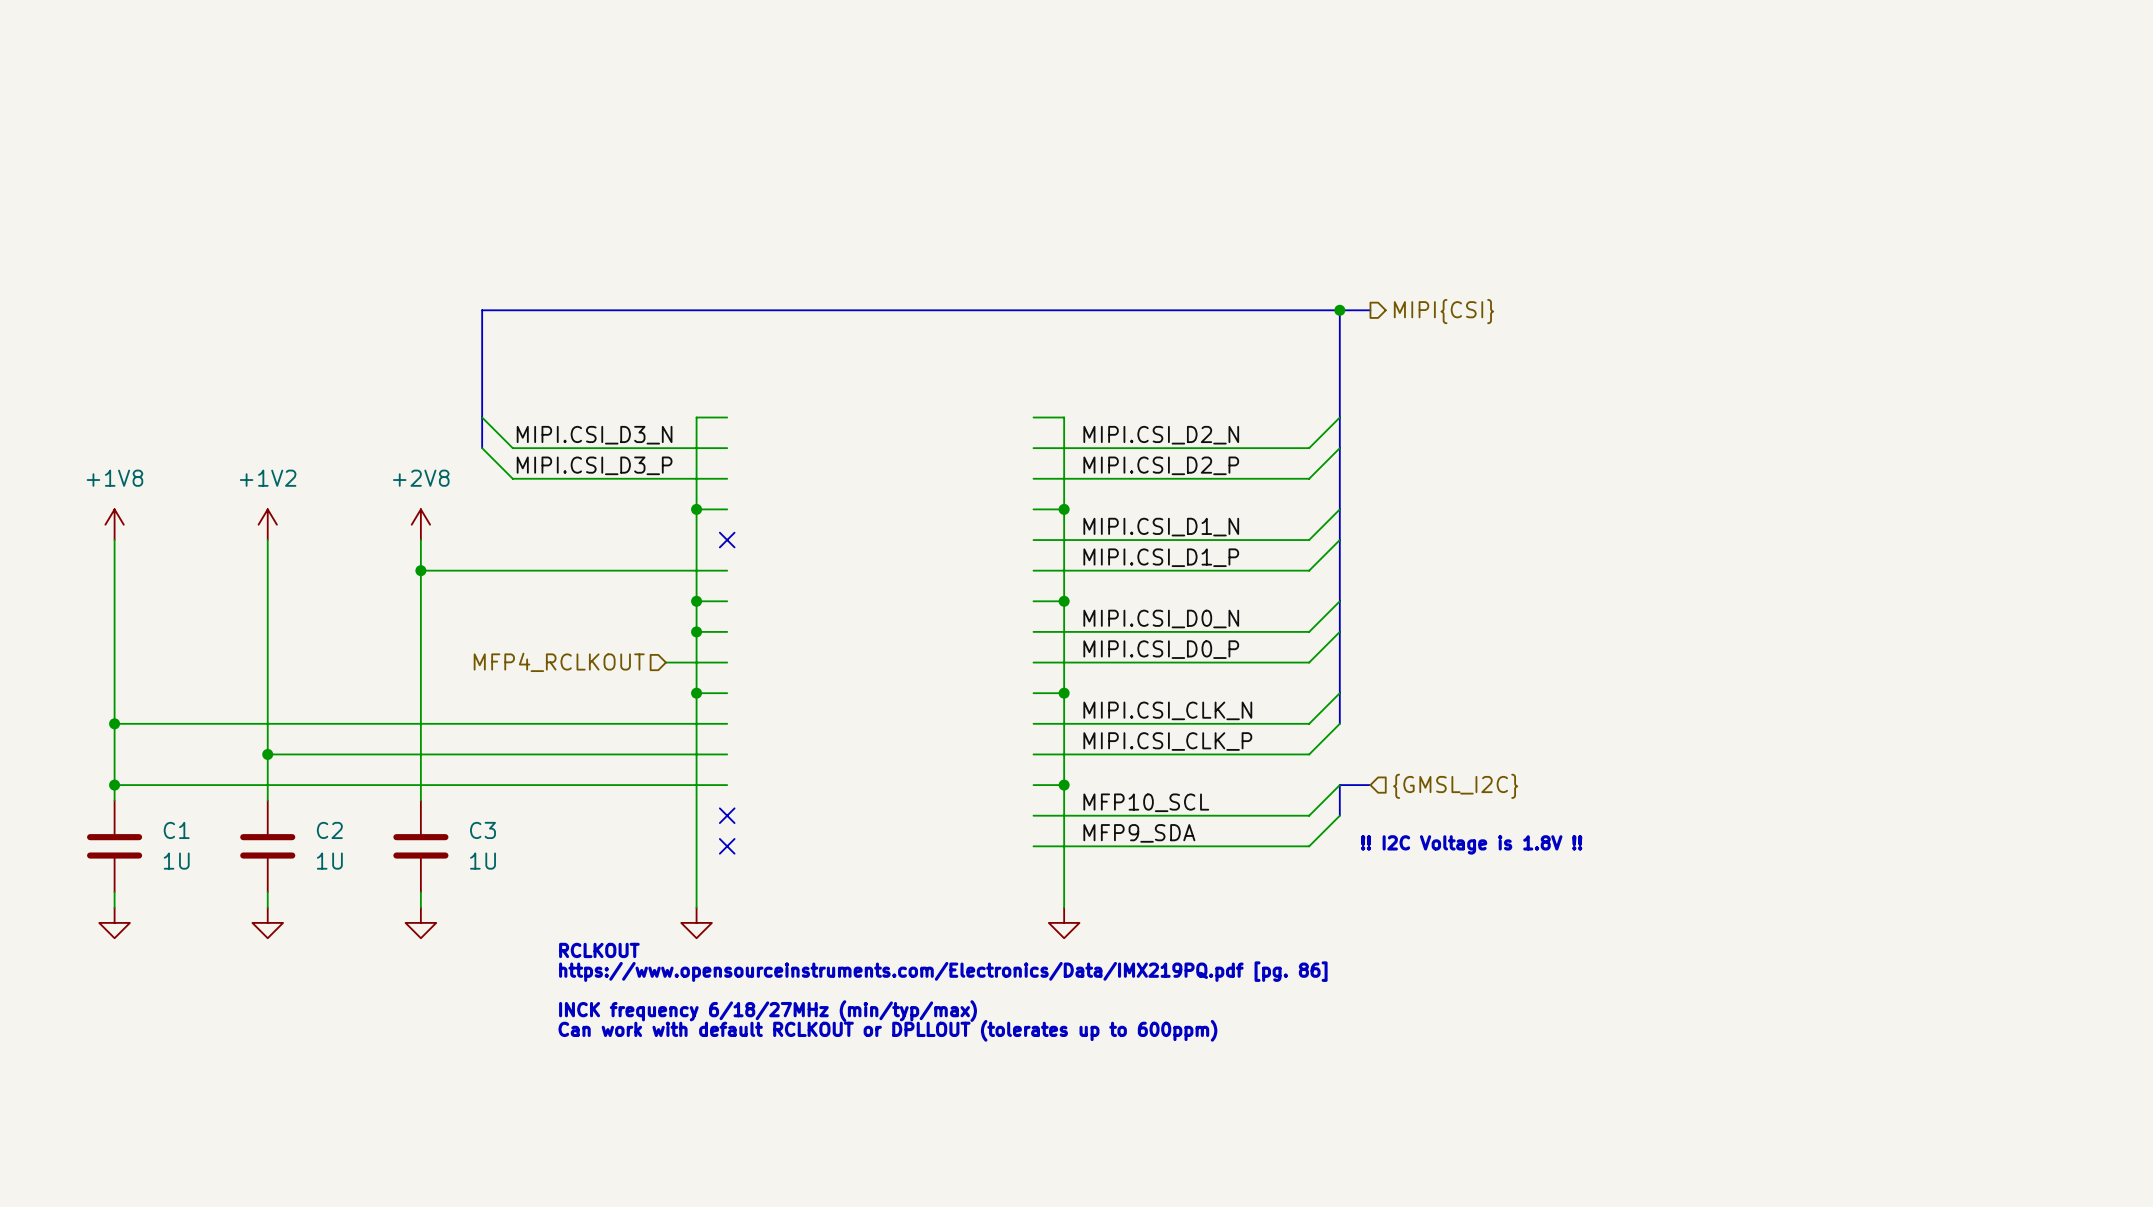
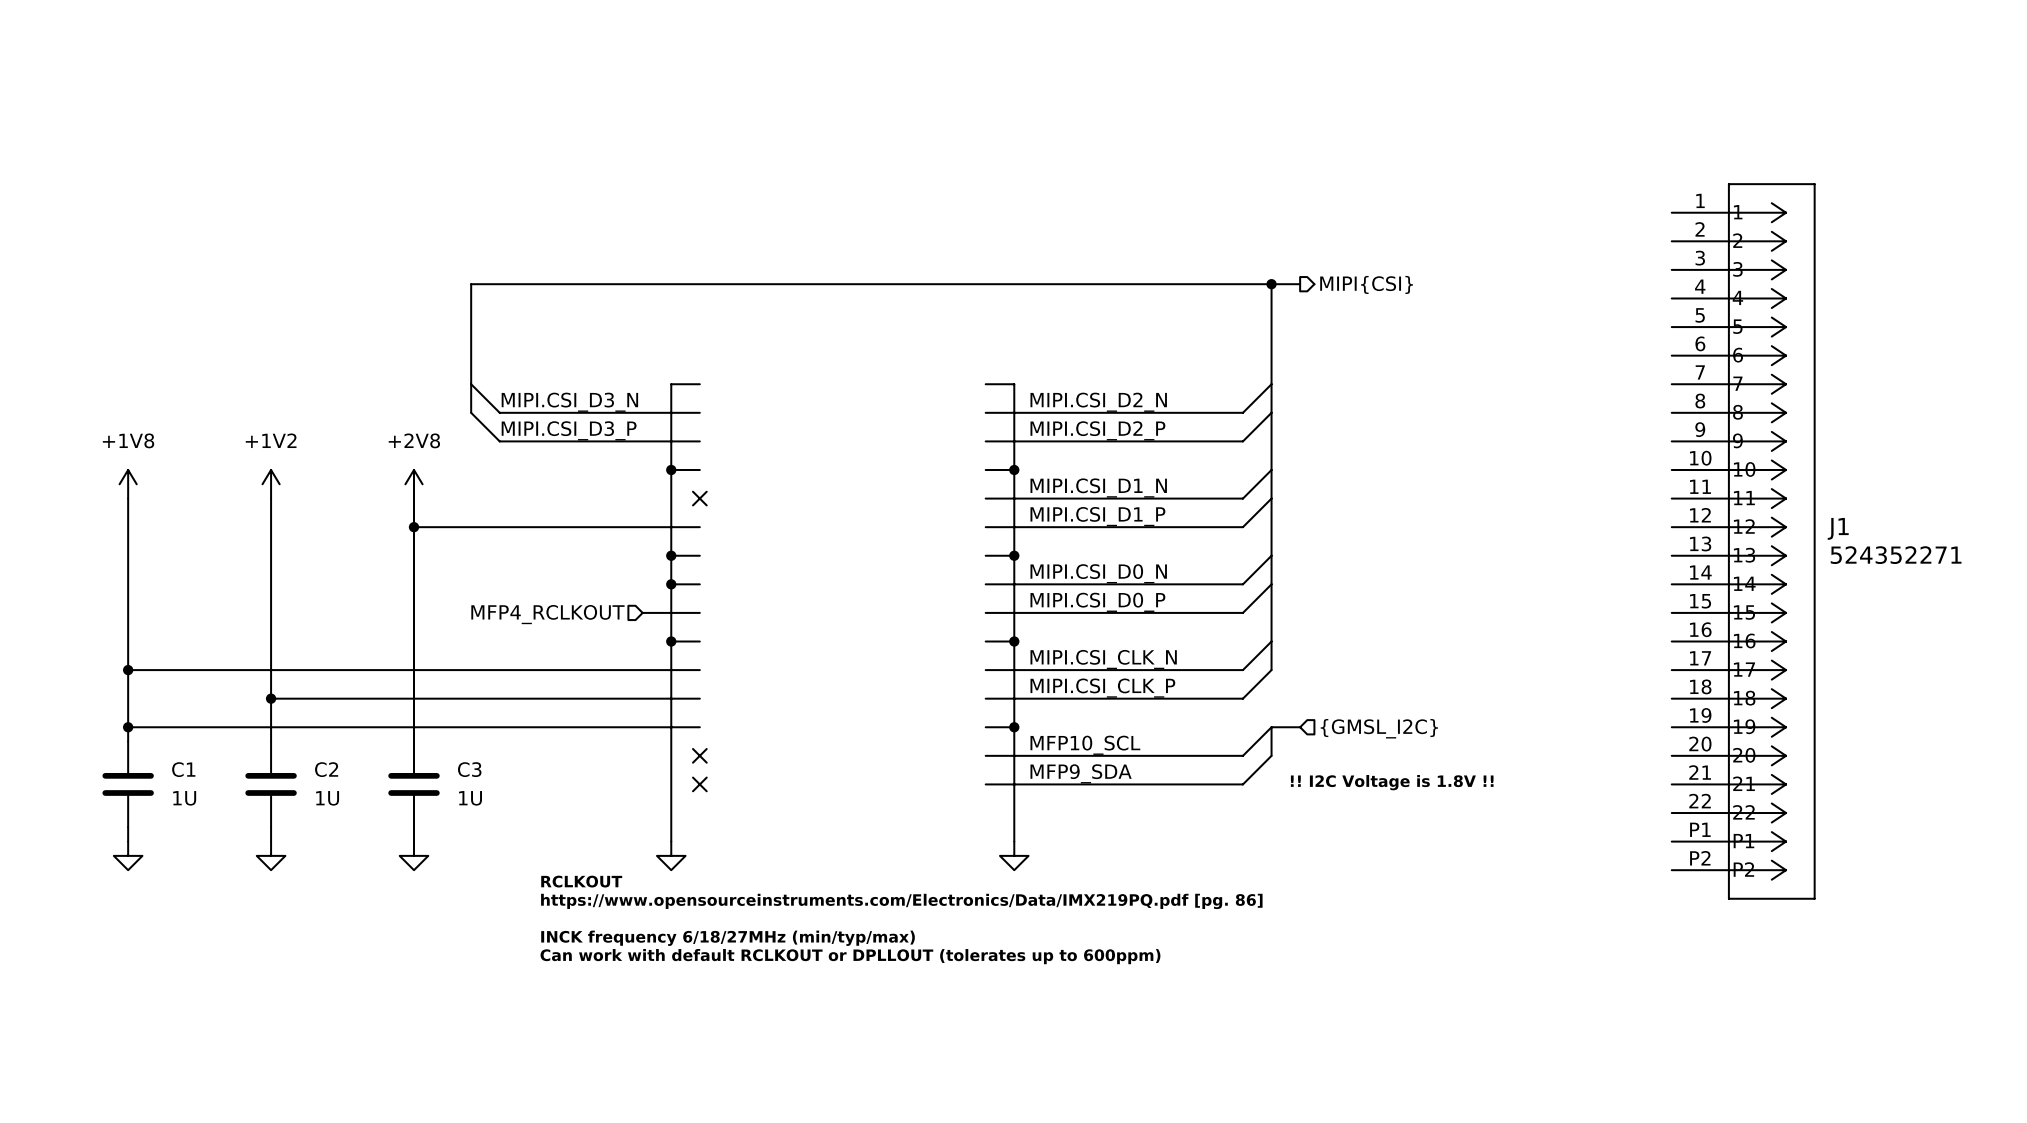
J1: none -> 524352271 (1743, 541)

